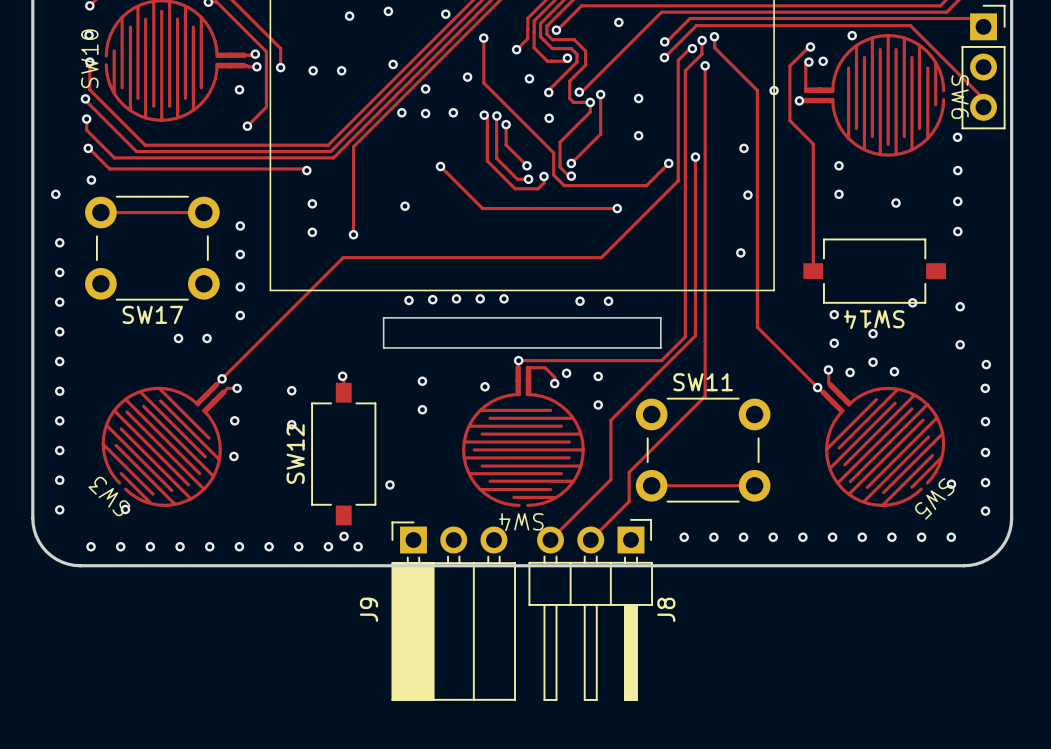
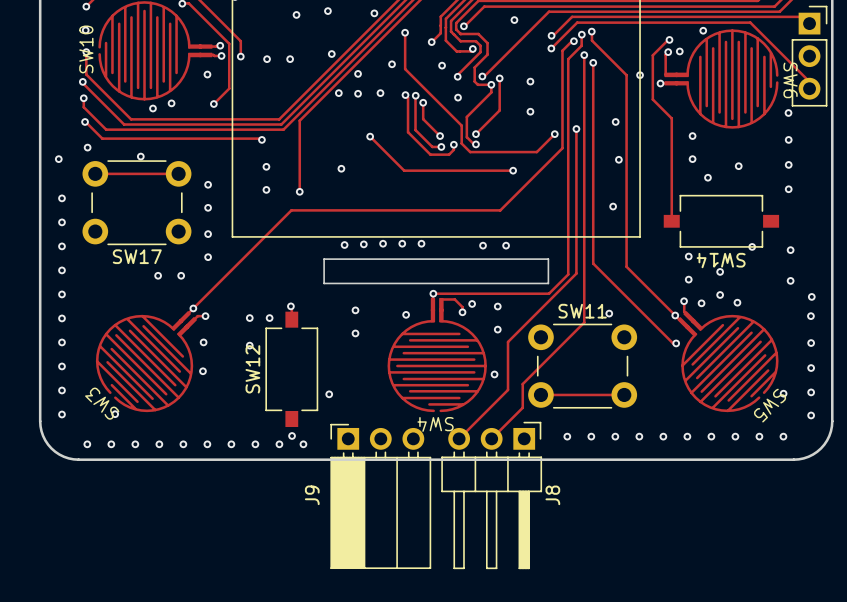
track: none -> (593, 62) (593, 263) (673, 343) (676, 343)
via: none -> (593, 62)
via: none -> (171, 103)
via: none -> (152, 108)
via: none -> (140, 156)
via: none -> (707, 177)
via: none -> (609, 313)
via: none -> (269, 318)
via: none -> (676, 343)
via: none -> (494, 374)

